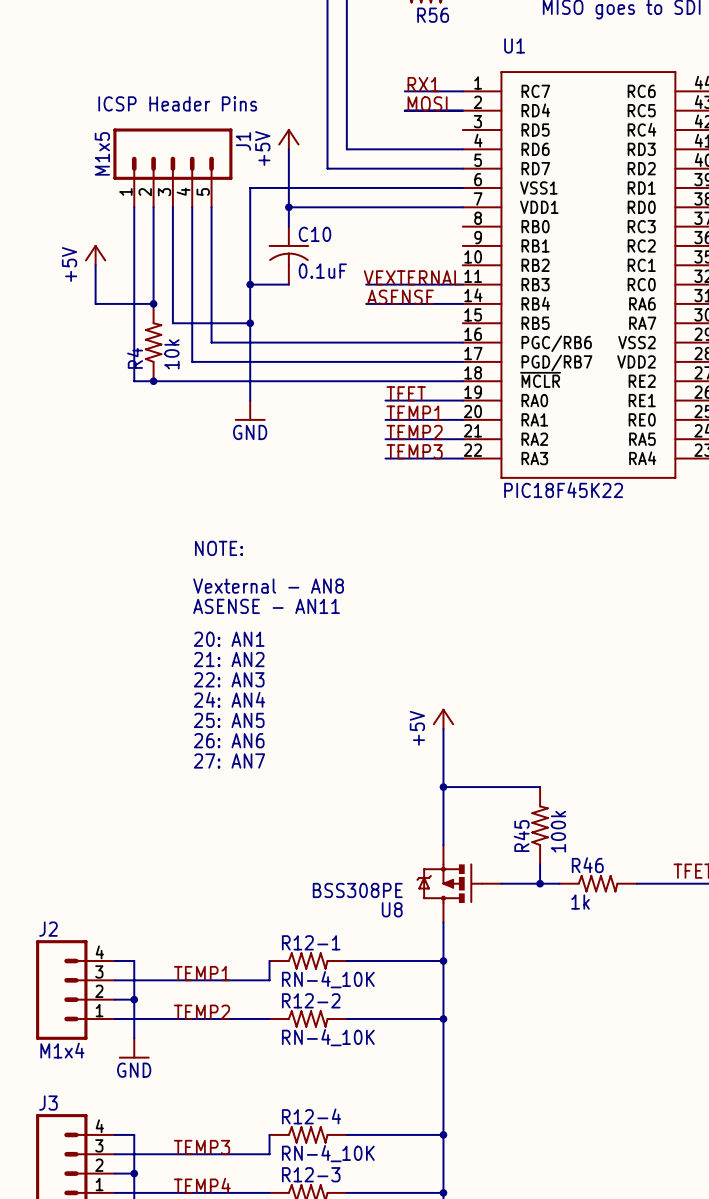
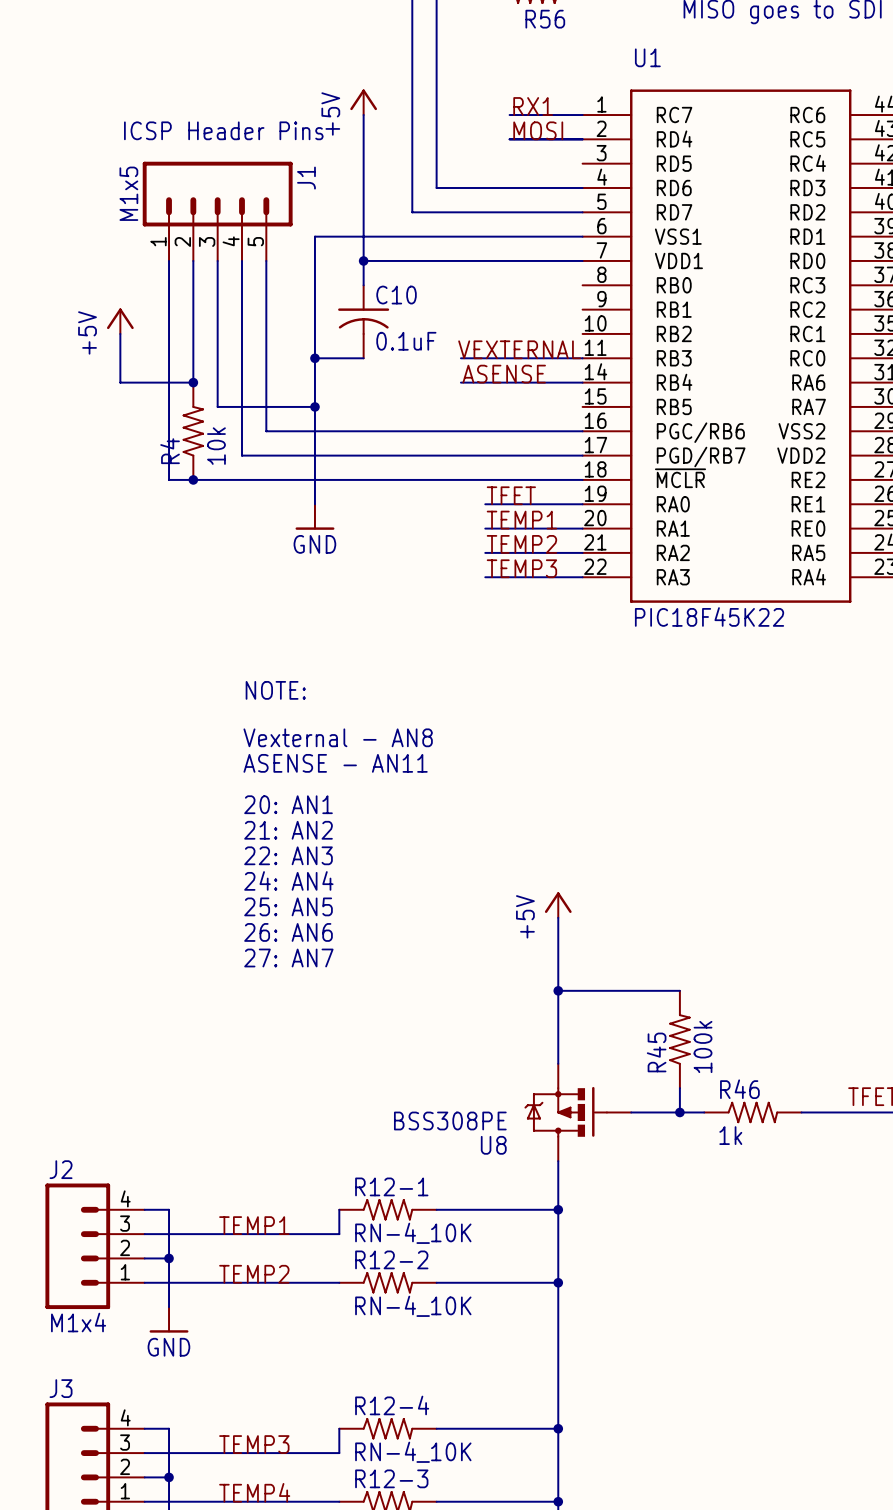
wire: none -> (363, 115) (363, 187)
power symbol position: +5V (288, 139) -> +5V (363, 102)

